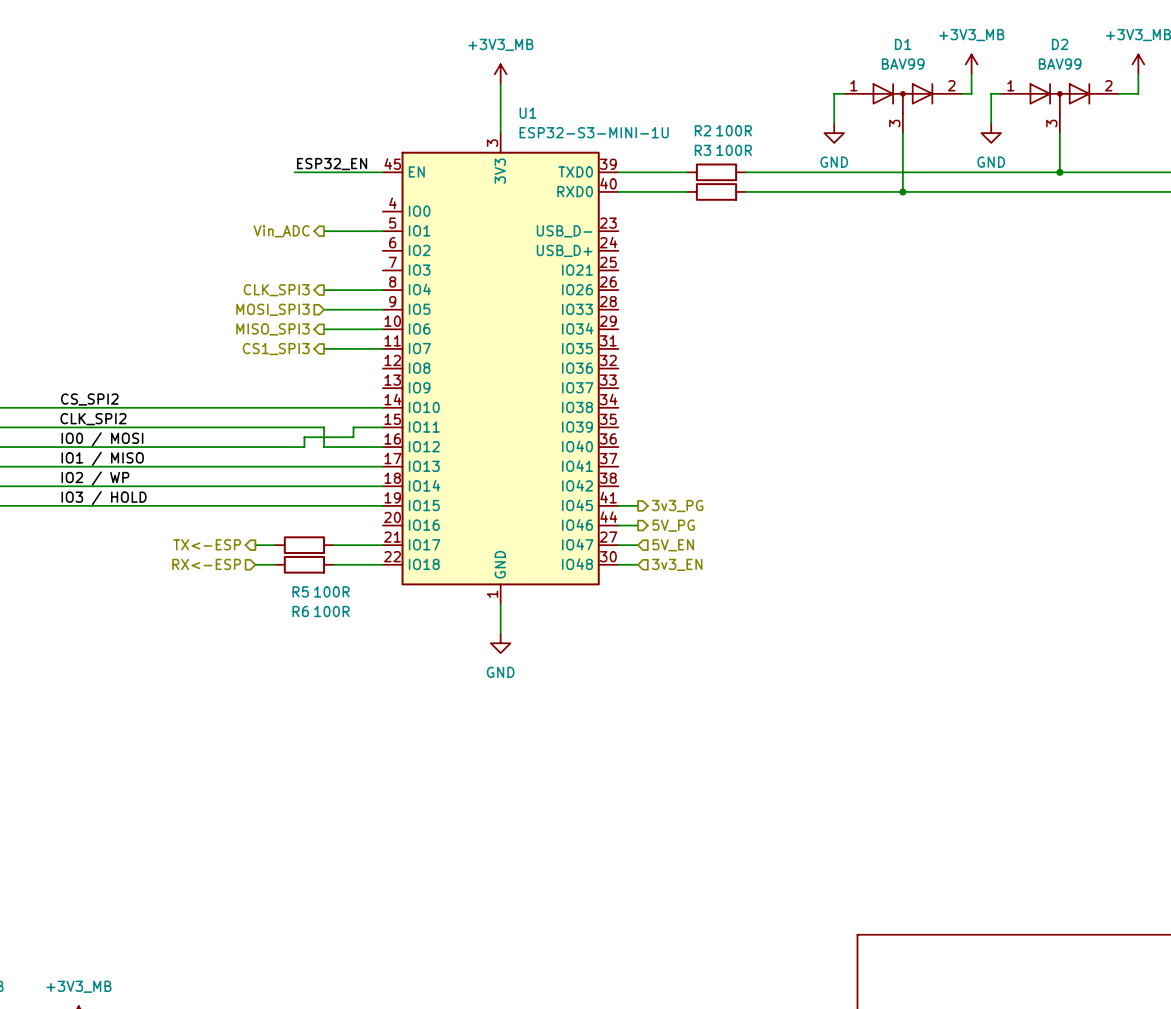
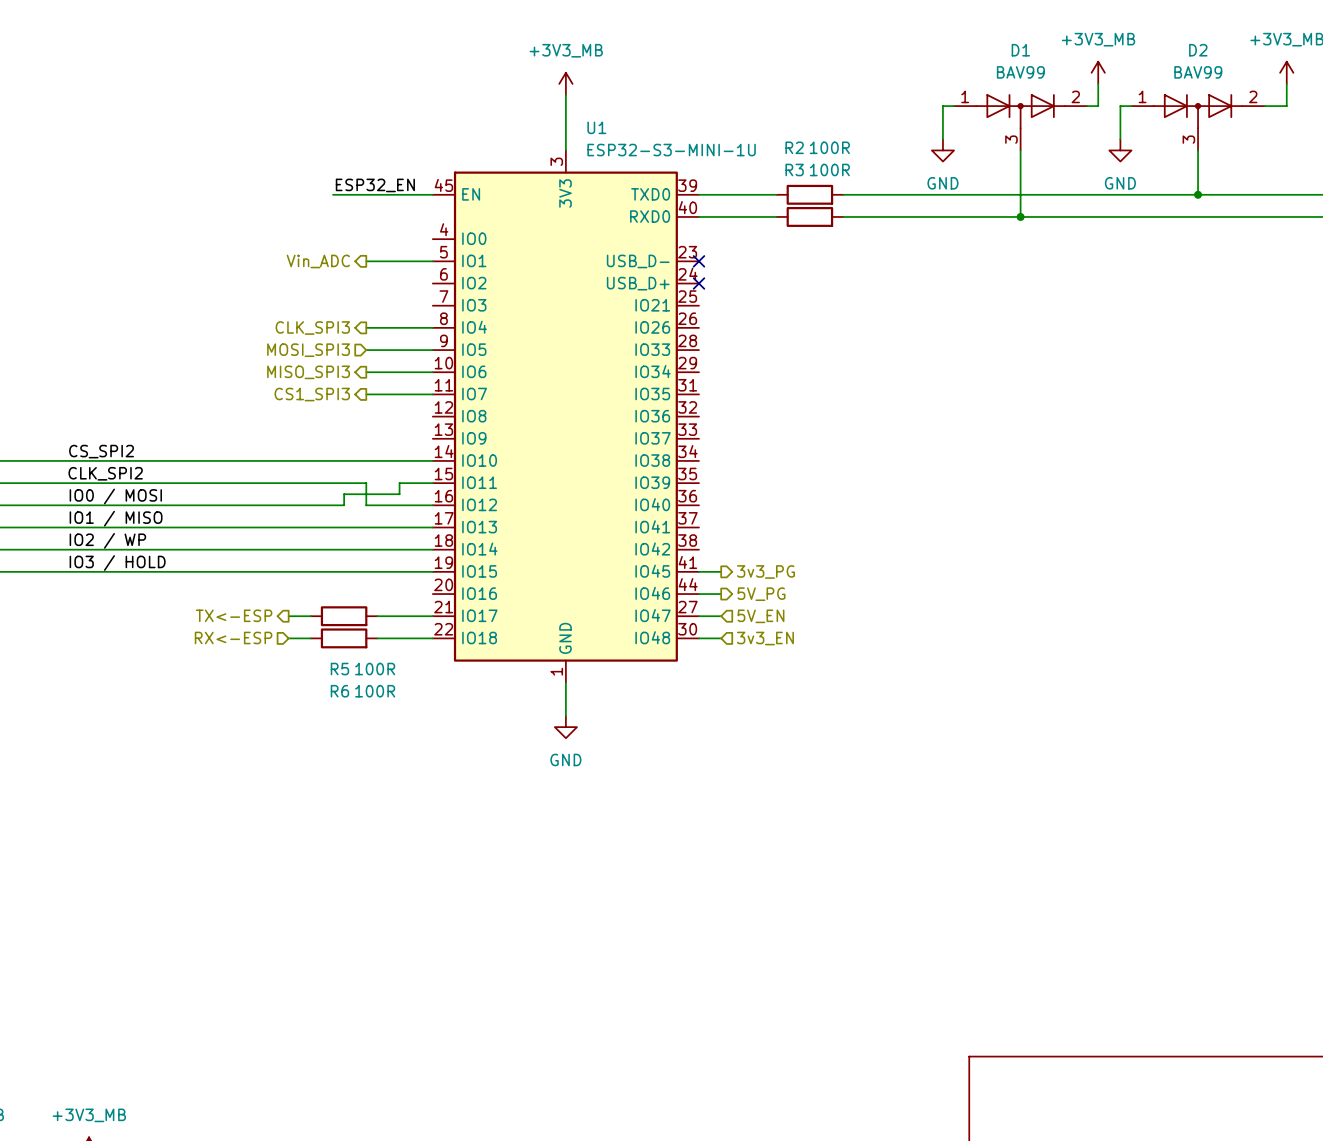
no-connect mark: none -> (698, 261)
no-connect mark: none -> (698, 283)

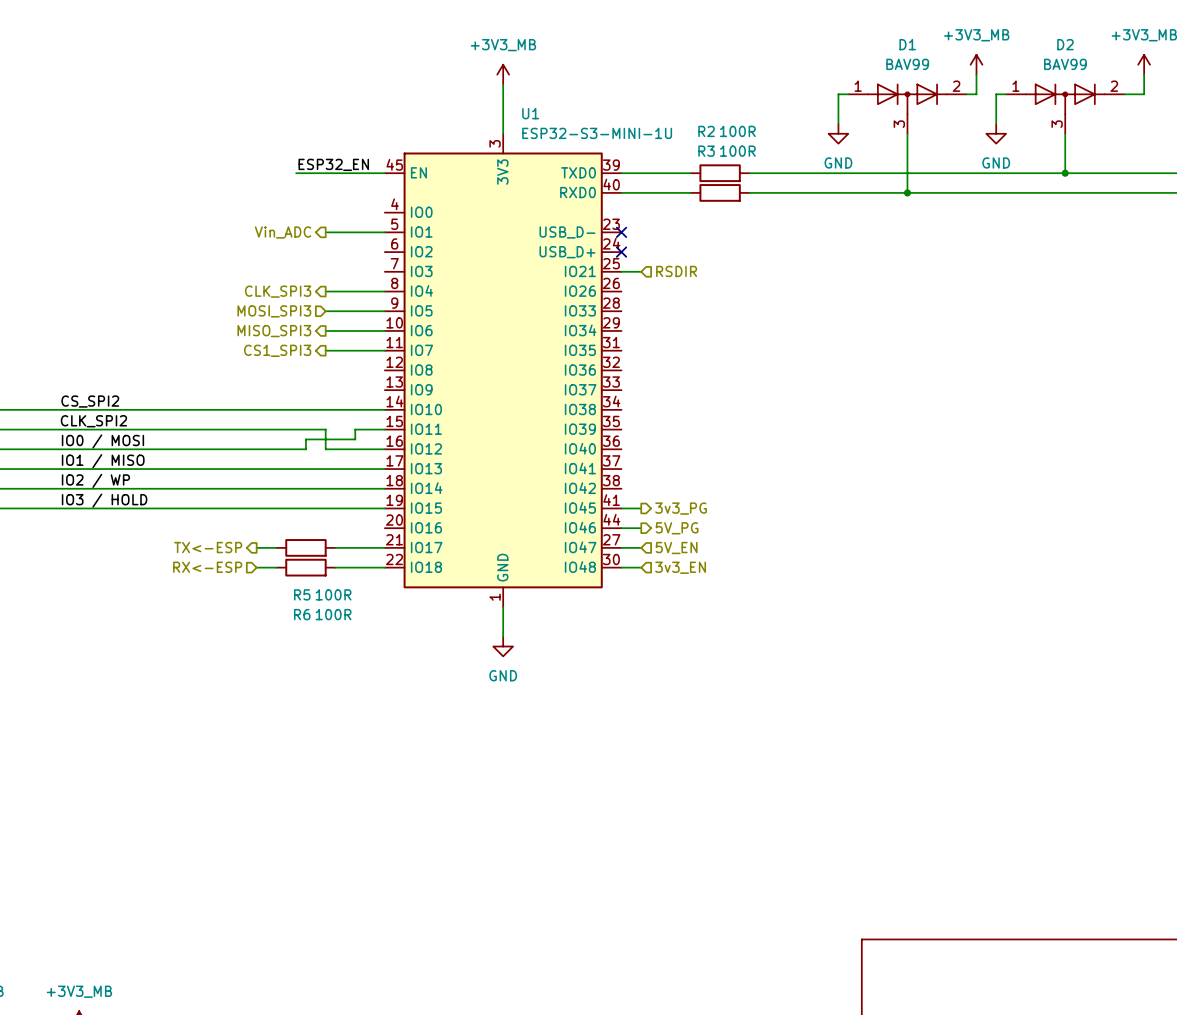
wire: none -> (621, 271) (641, 271)
hierarchical label: none -> RSDIR (676, 271)

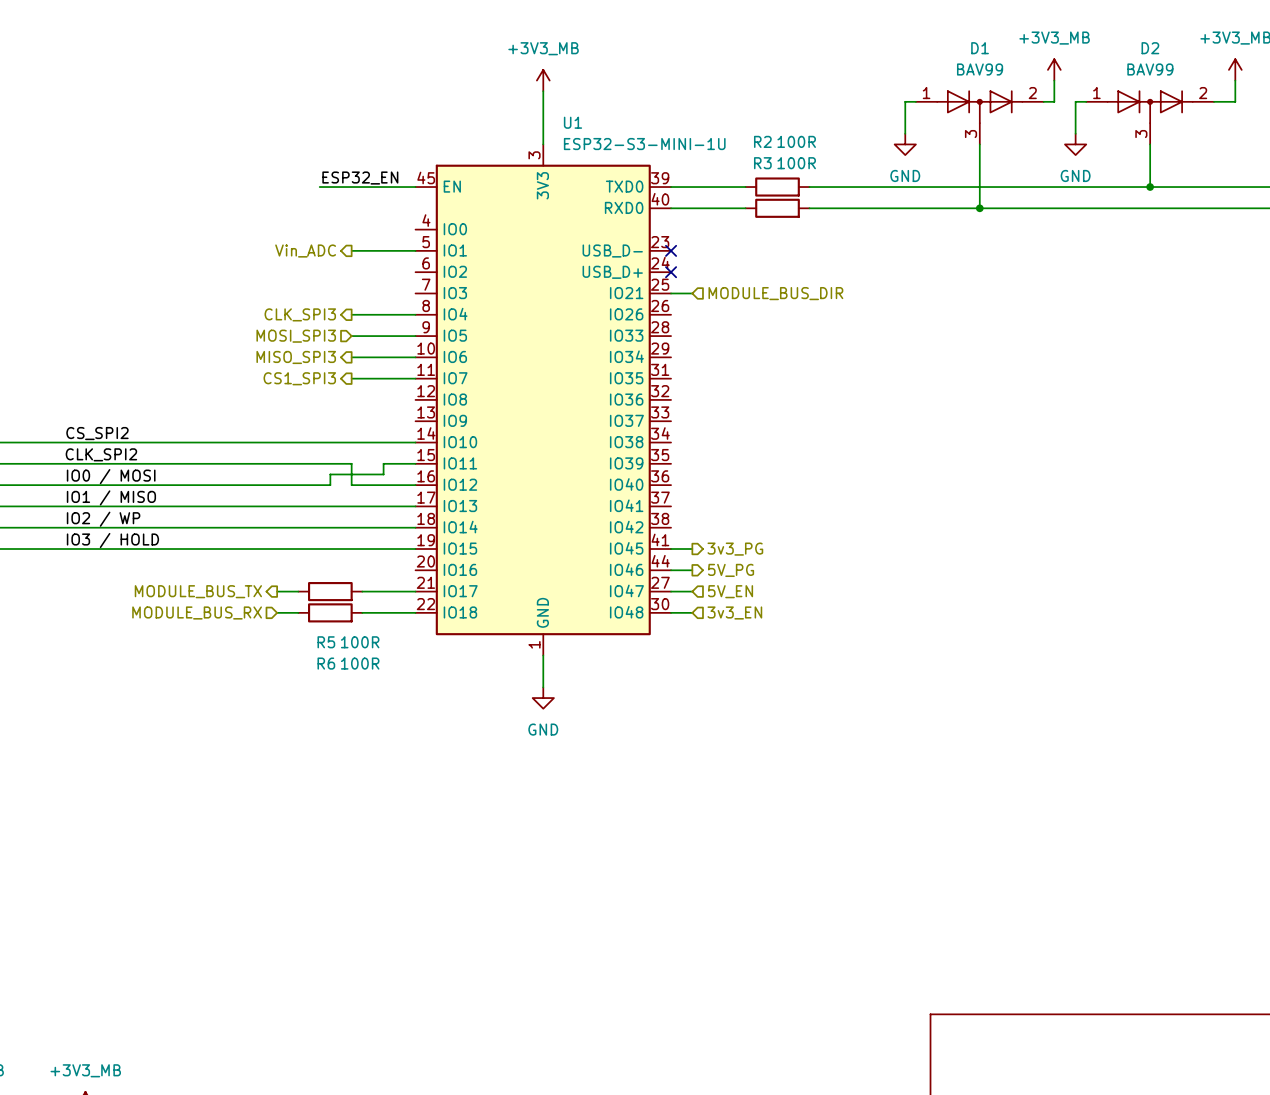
hierarchical label: RSDIR (676, 271) -> MODULE_BUS_DIR (775, 293)
hierarchical label: TX<-ESP (208, 547) -> MODULE_BUS_TX (198, 591)
hierarchical label: RX<-ESP (207, 567) -> MODULE_BUS_RX (197, 612)

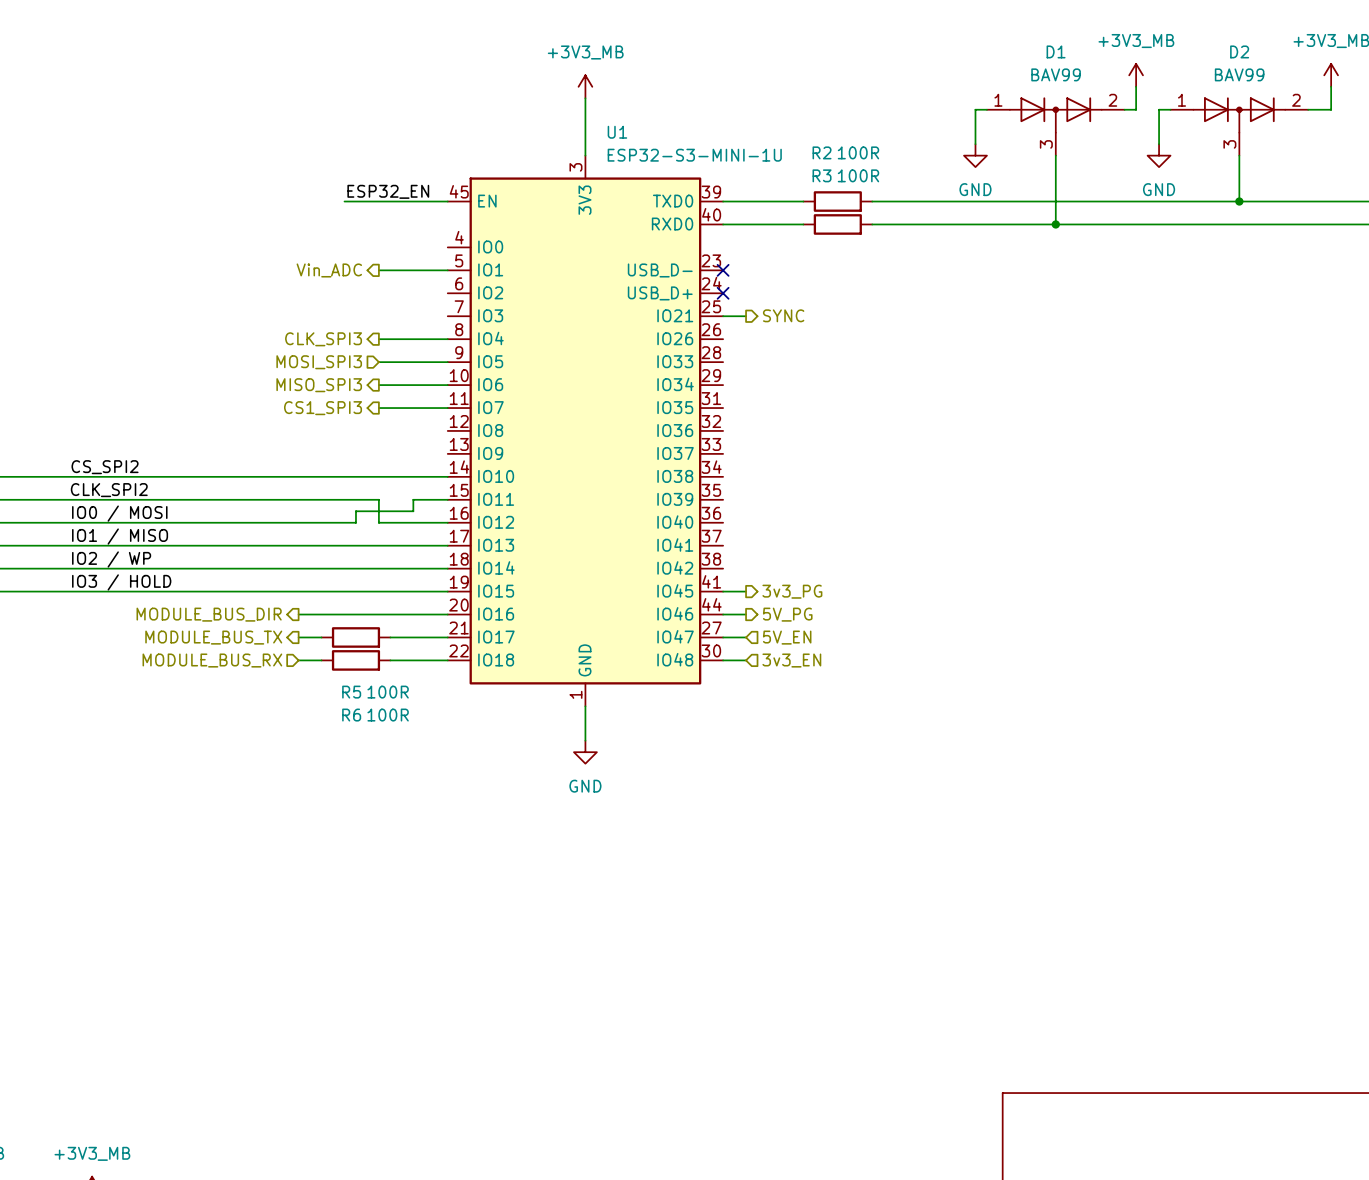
hierarchical label shape: input (775, 293) -> output (783, 315)
hierarchical label: MODULE_BUS_DIR (775, 293) -> SYNC (783, 315)
hierarchical label: none -> MODULE_BUS_DIR (209, 614)
wire: none -> (298, 614) (447, 614)

